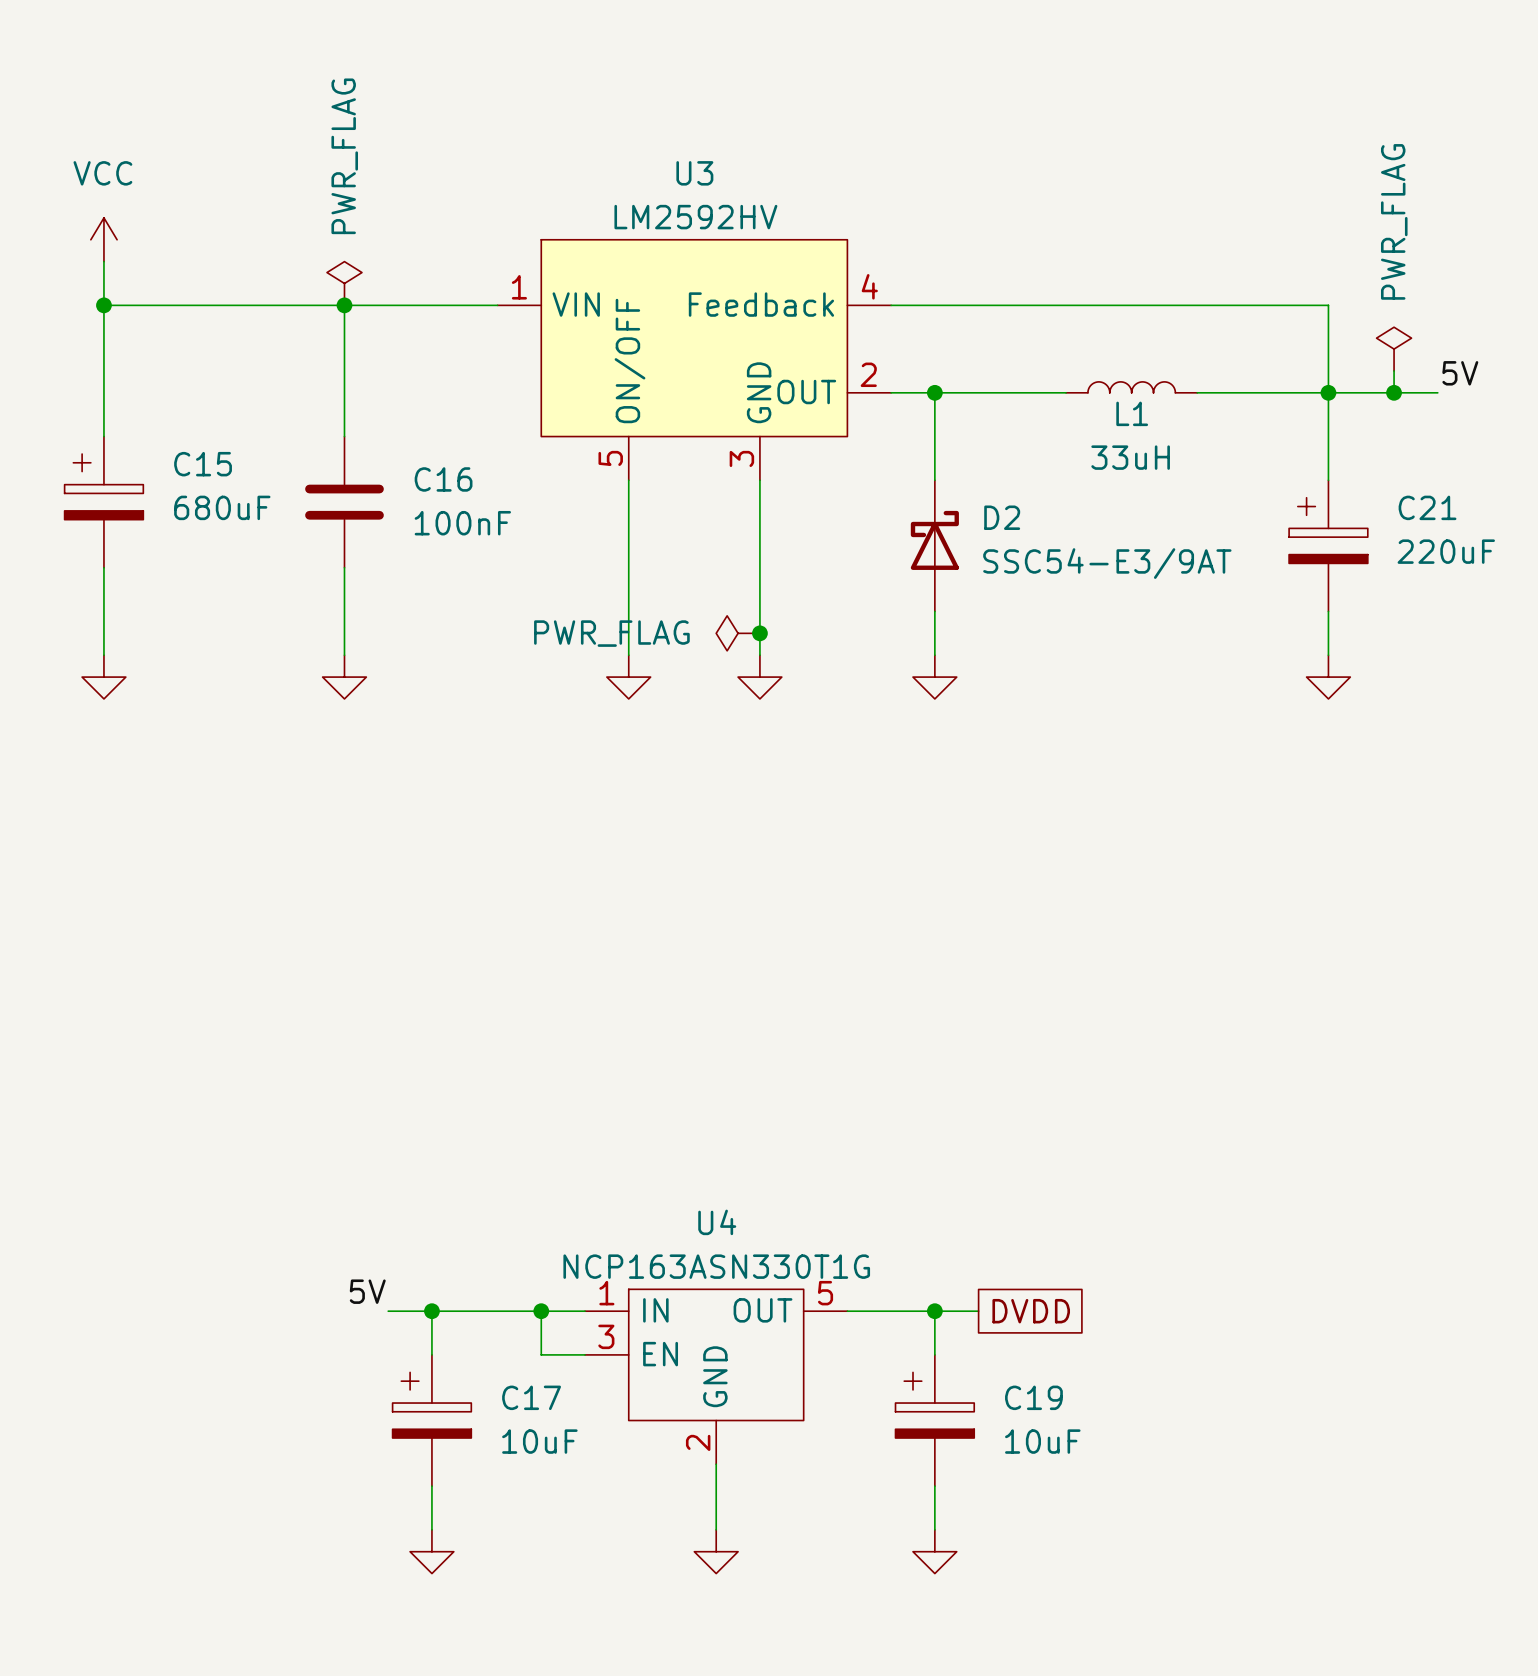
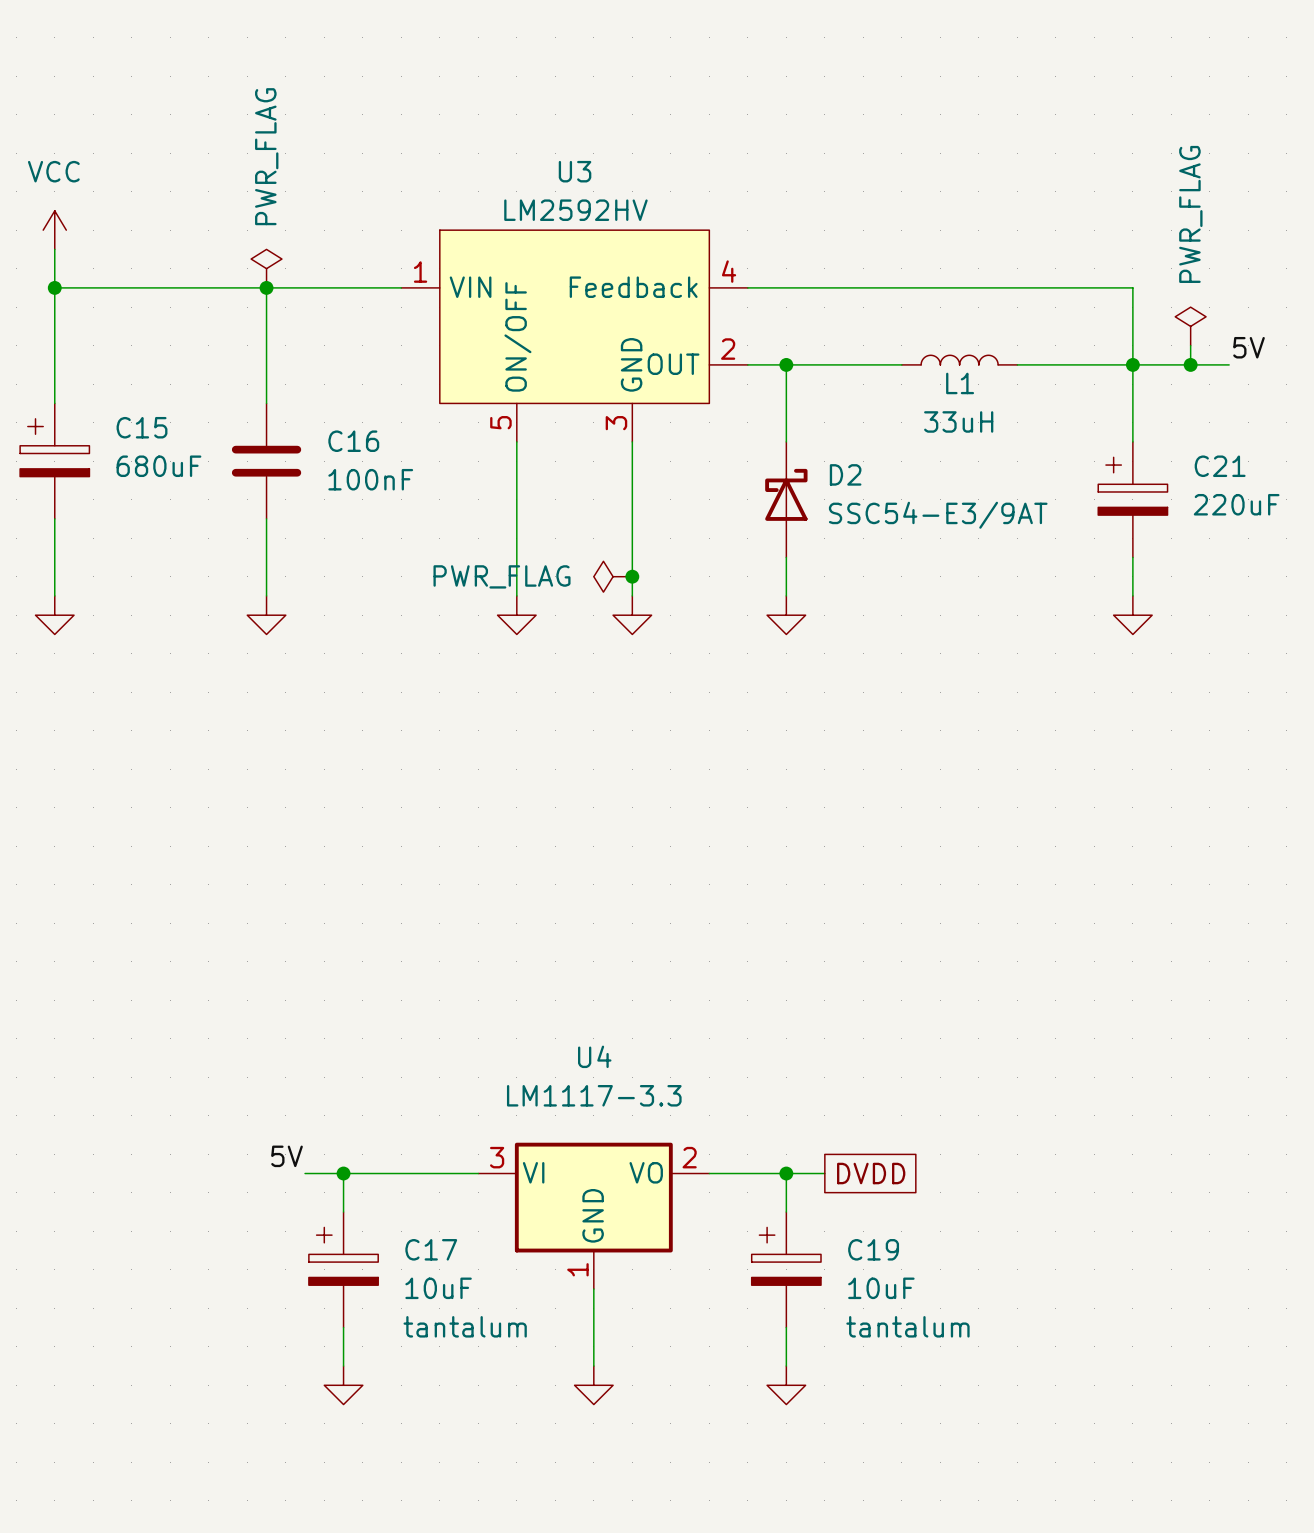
U4 value: NCP163ASN330T1G (716, 1266) -> LM1117-3.3 (594, 1095)
U4 symbol: [585, 1289, 848, 1465] -> [478, 1142, 710, 1290]
wire: (541, 1311) (541, 1354) (585, 1354) -> none
junction: (541, 1311) -> none
C17 text: none -> tantalum (465, 1326)
C19 text: none -> tantalum (907, 1326)

